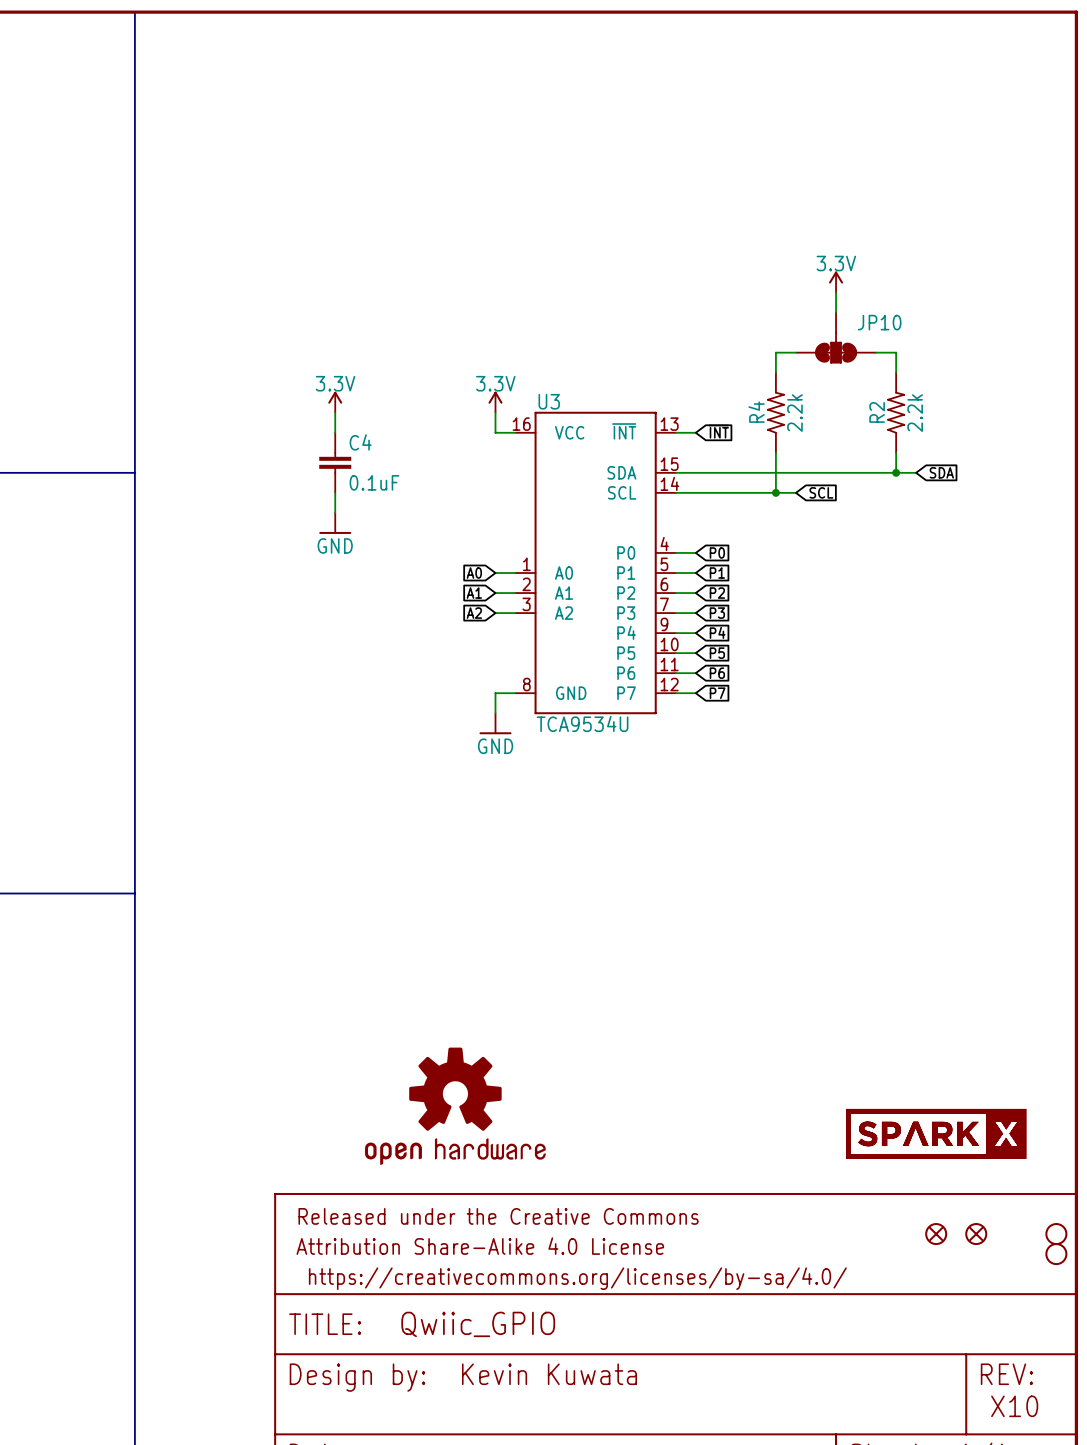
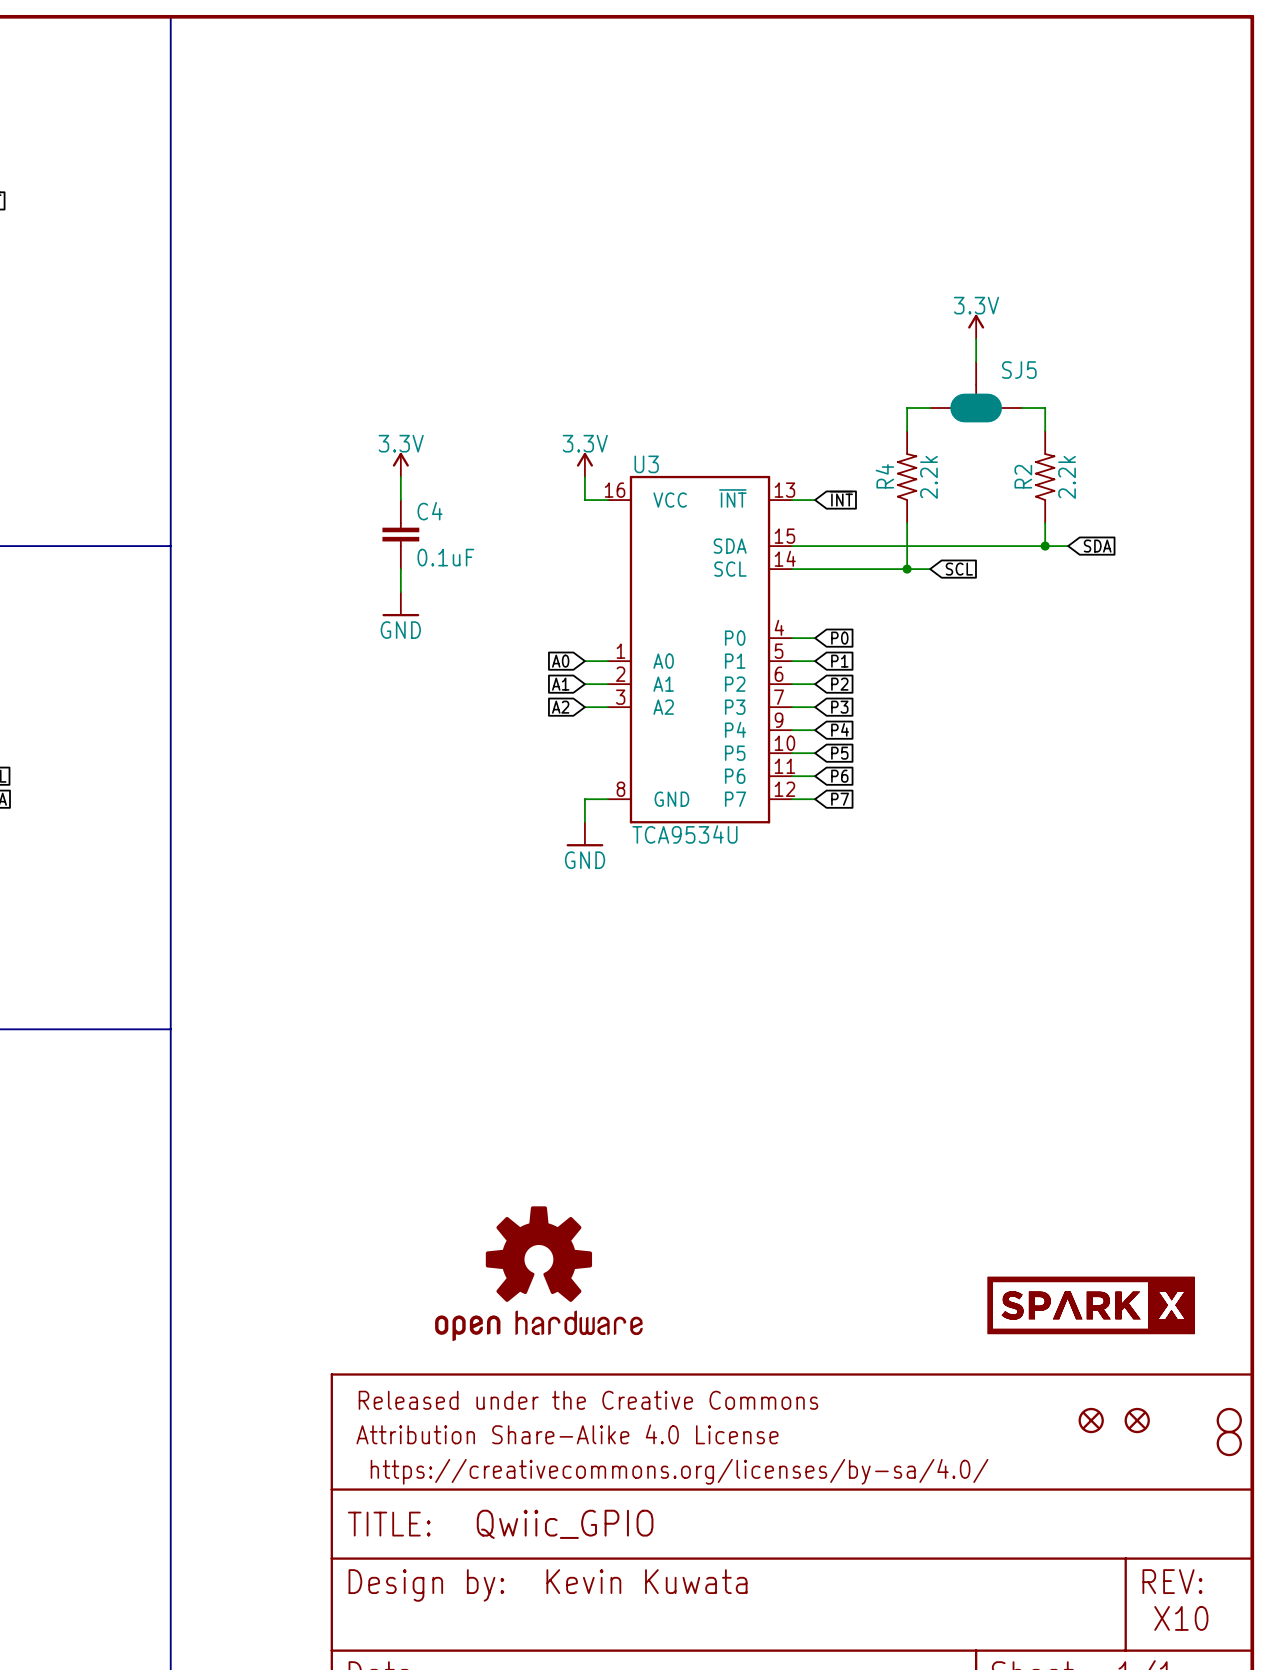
JP10: (836, 337) -> none
SJ5: none -> (976, 392)

